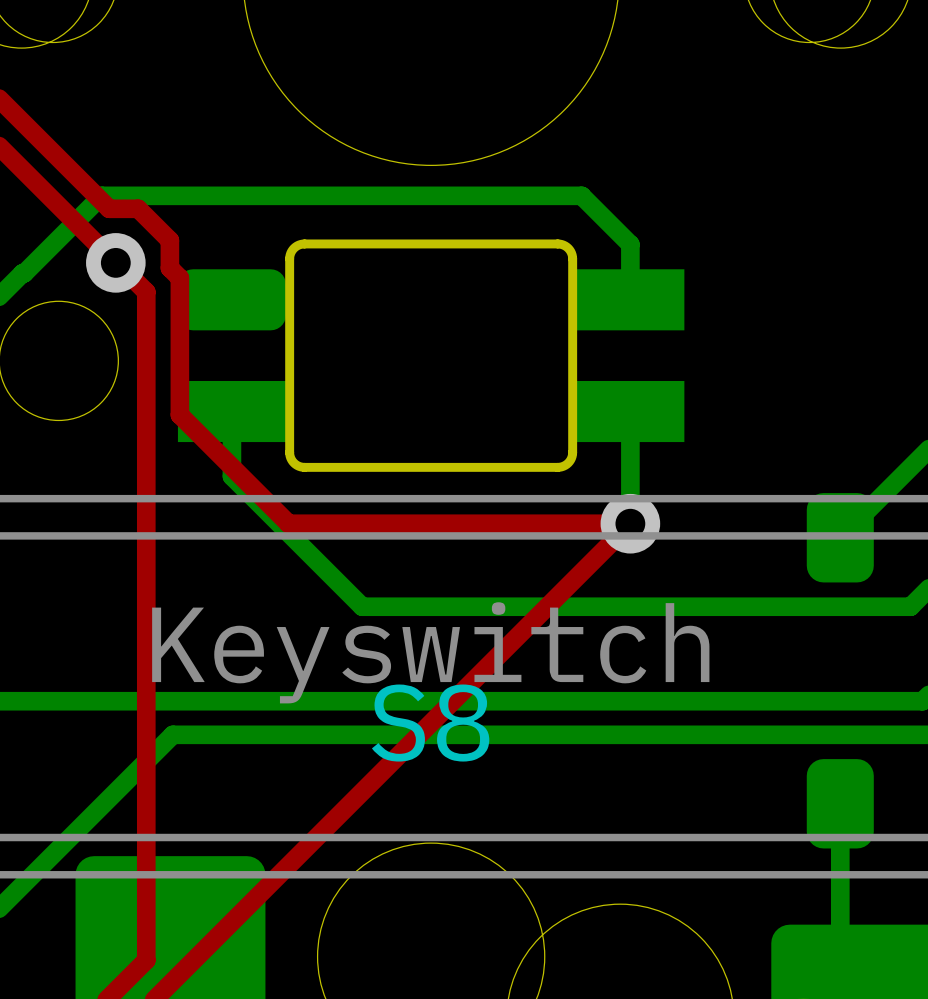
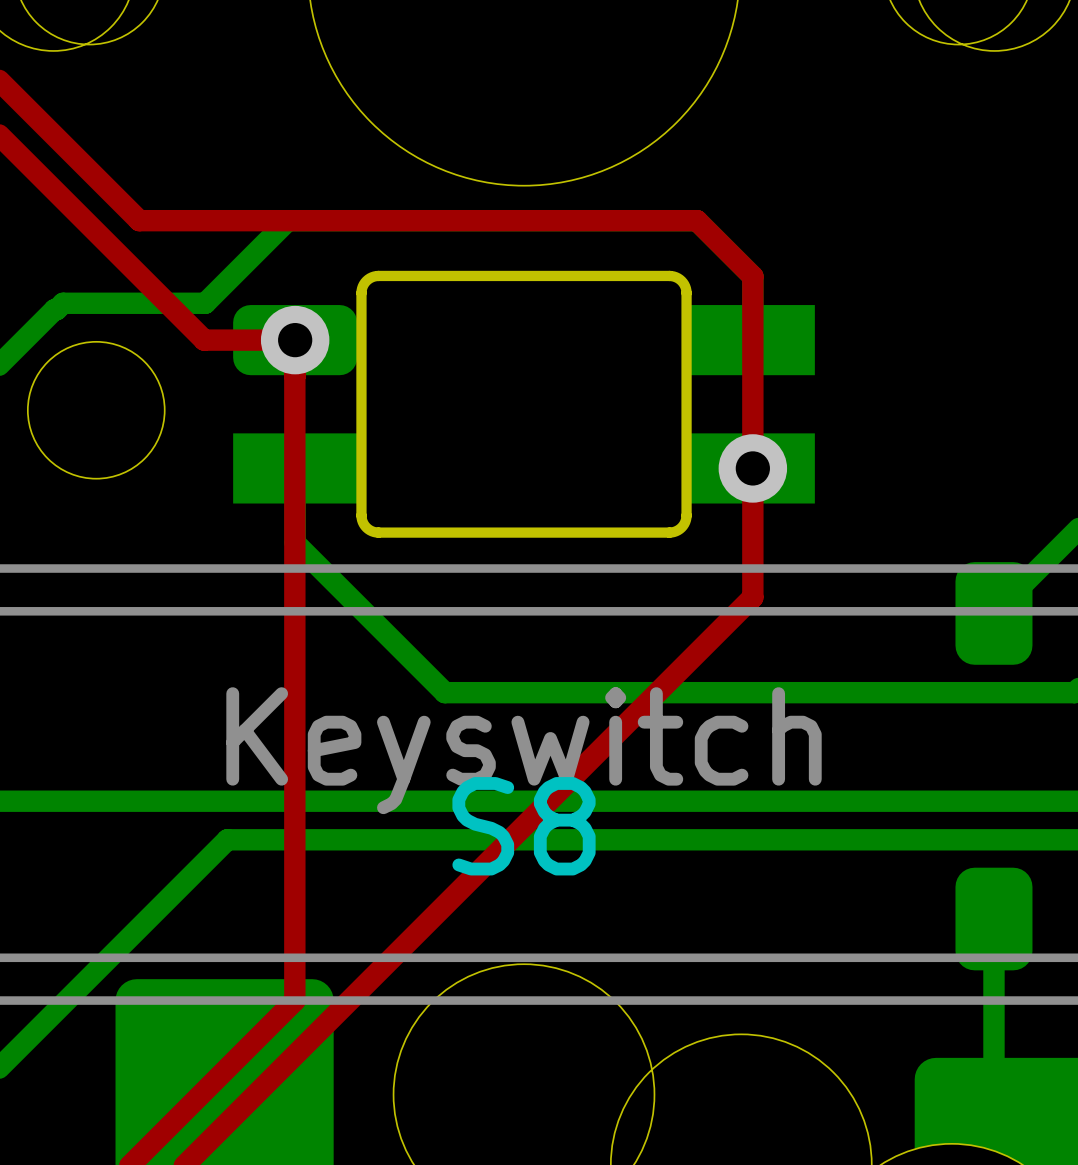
top track: (96, 195) (109, 208) (138, 208) (169, 240) (169, 268) (179, 278) (179, 414) (288, 523) (630, 523) -> (139, 220) (696, 220) (752, 276) (752, 597)
bottom track: (225, 195) (101, 195) (29, 267) -> (287, 220) (205, 303) (63, 303)
top track: none -> (161, 297) (204, 340) (295, 340) (295, 375)
via position: (115, 262) -> (295, 340)
top track: (117, 262) (146, 291) (146, 960) -> (294, 375) (294, 1000) (196, 1098)
bottom track: (630, 411) (630, 523) -> none
via position: (630, 523) -> (752, 468)

